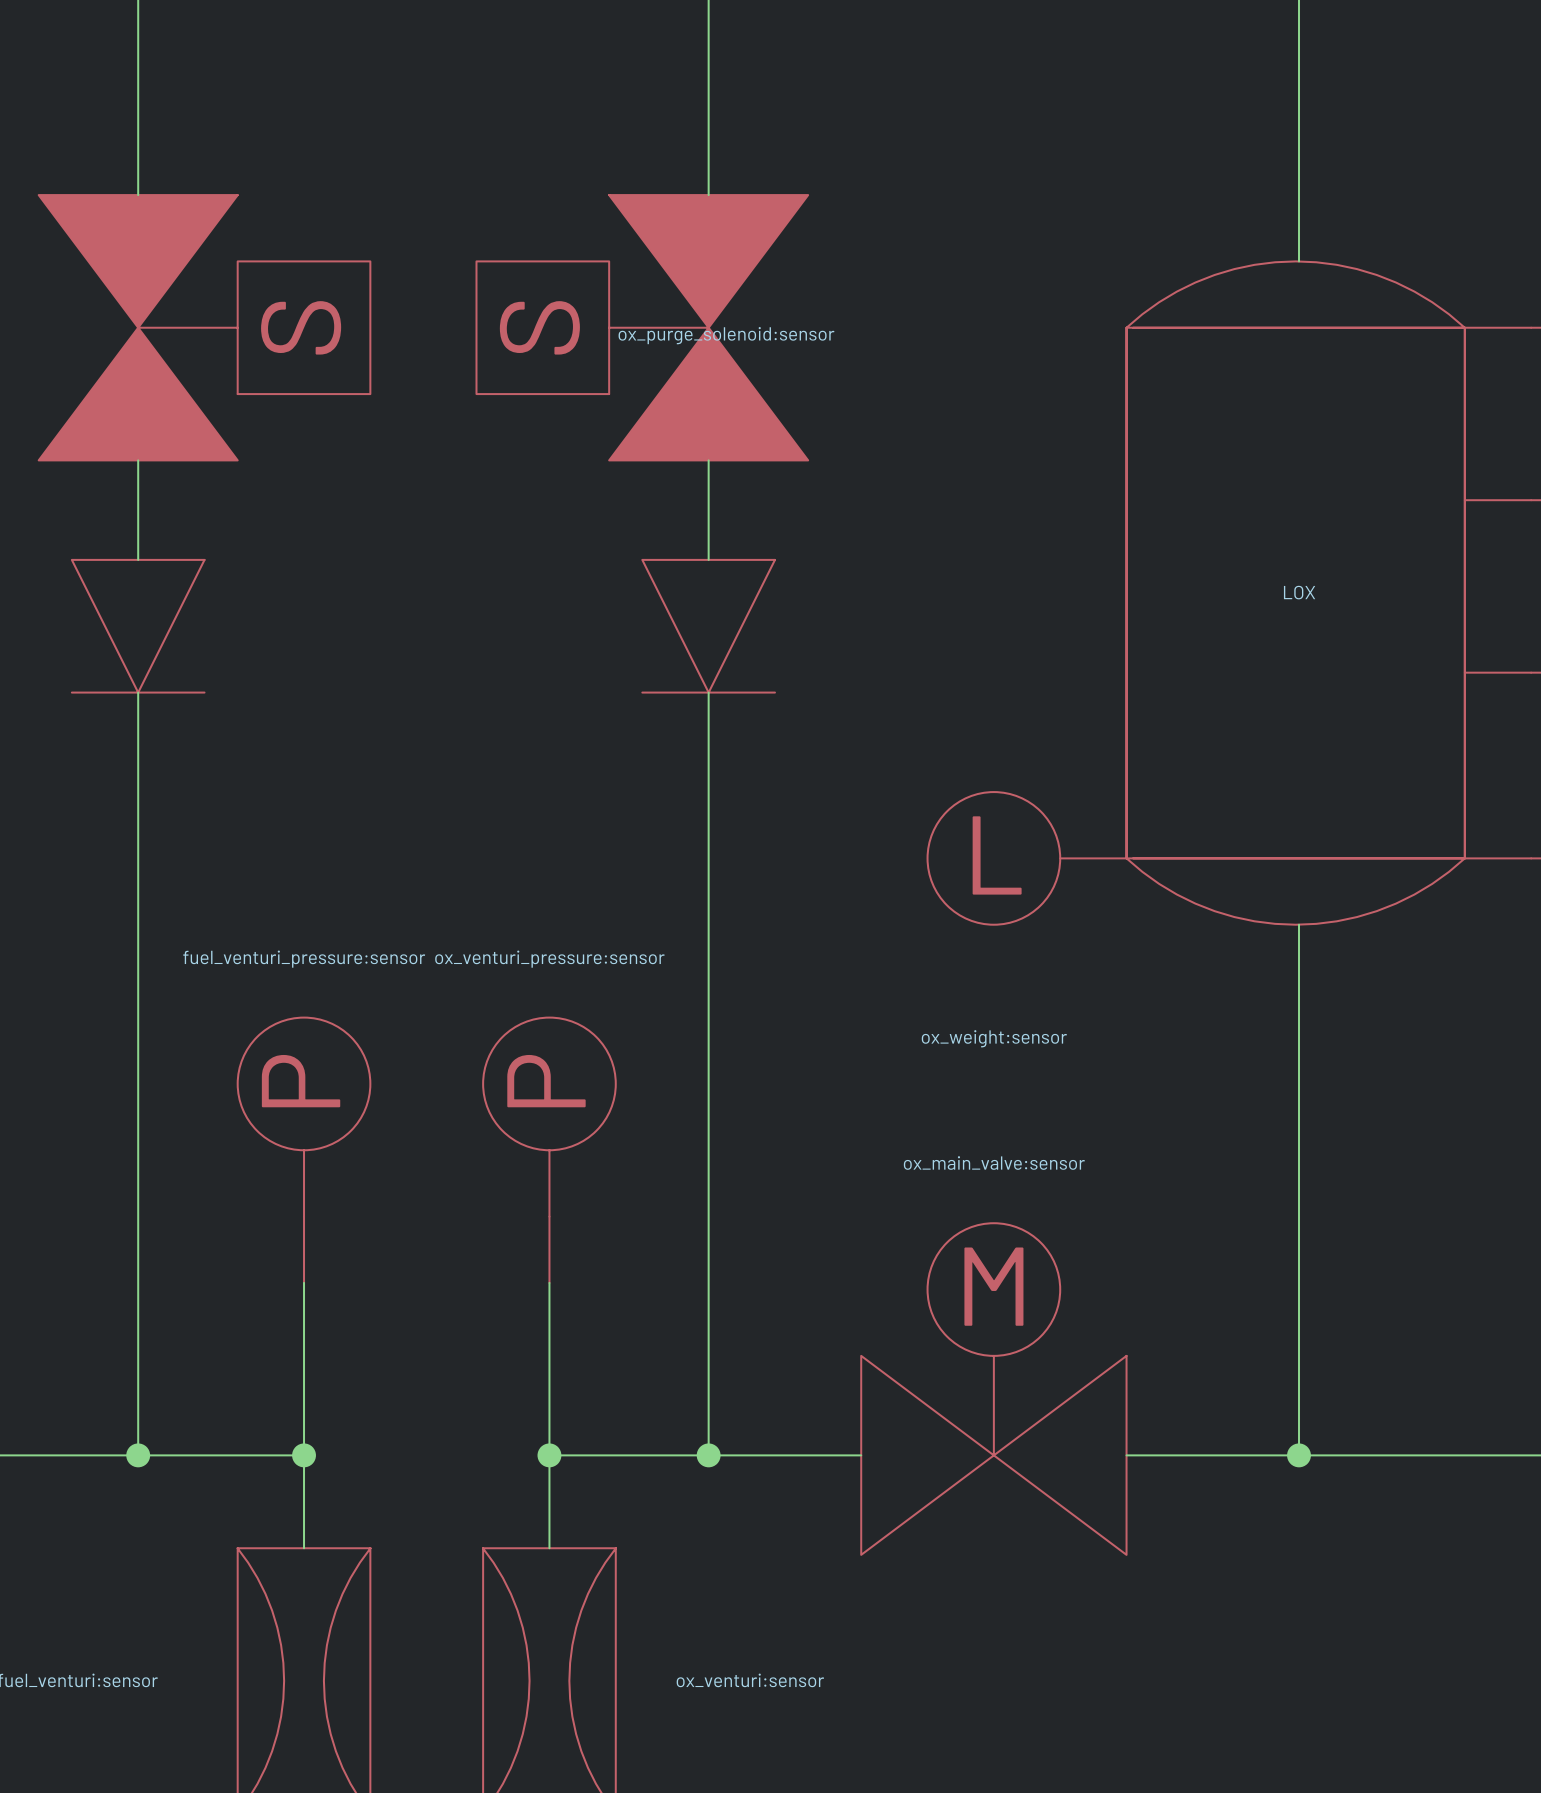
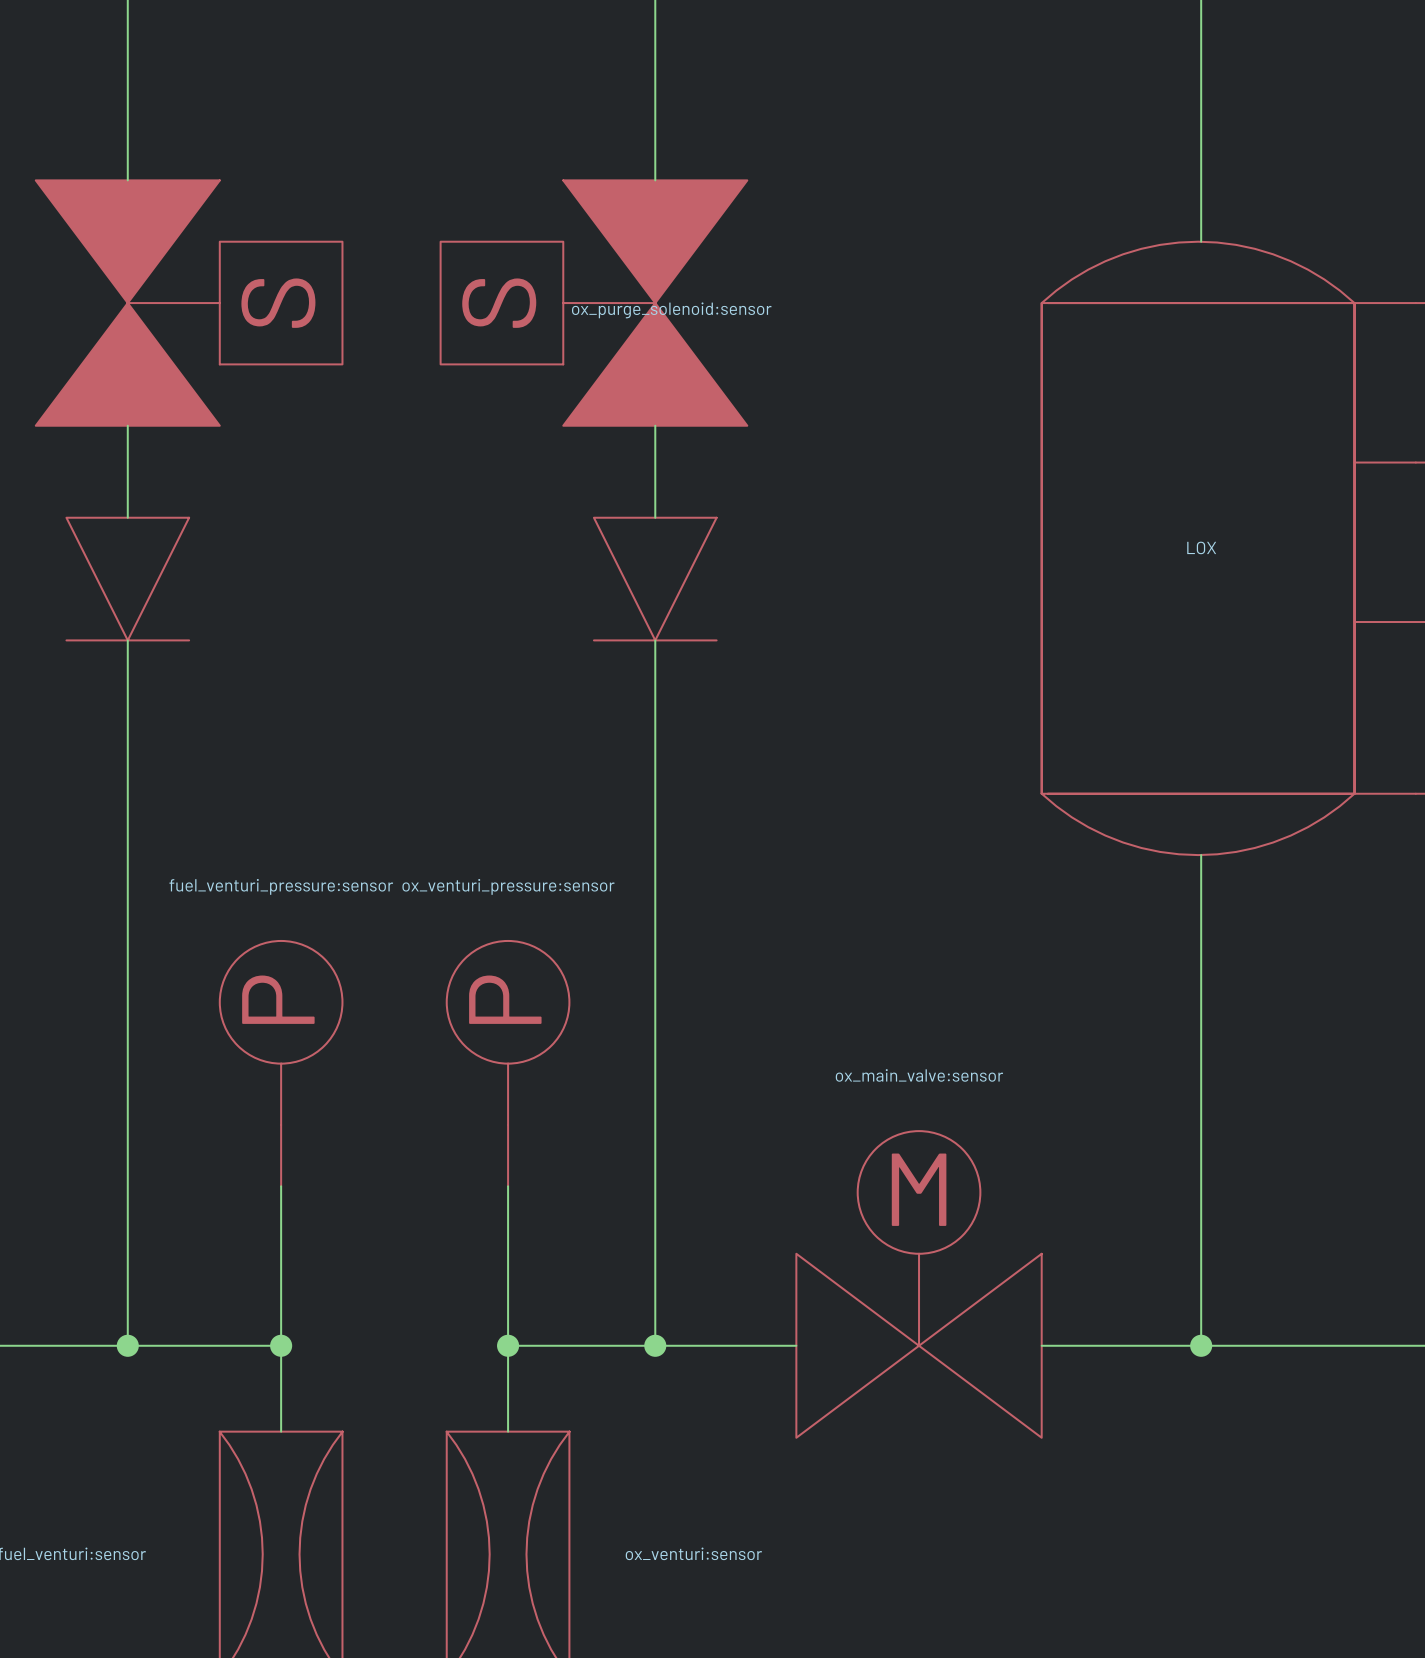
part: ox_weight:sensor (1027, 858) -> none

